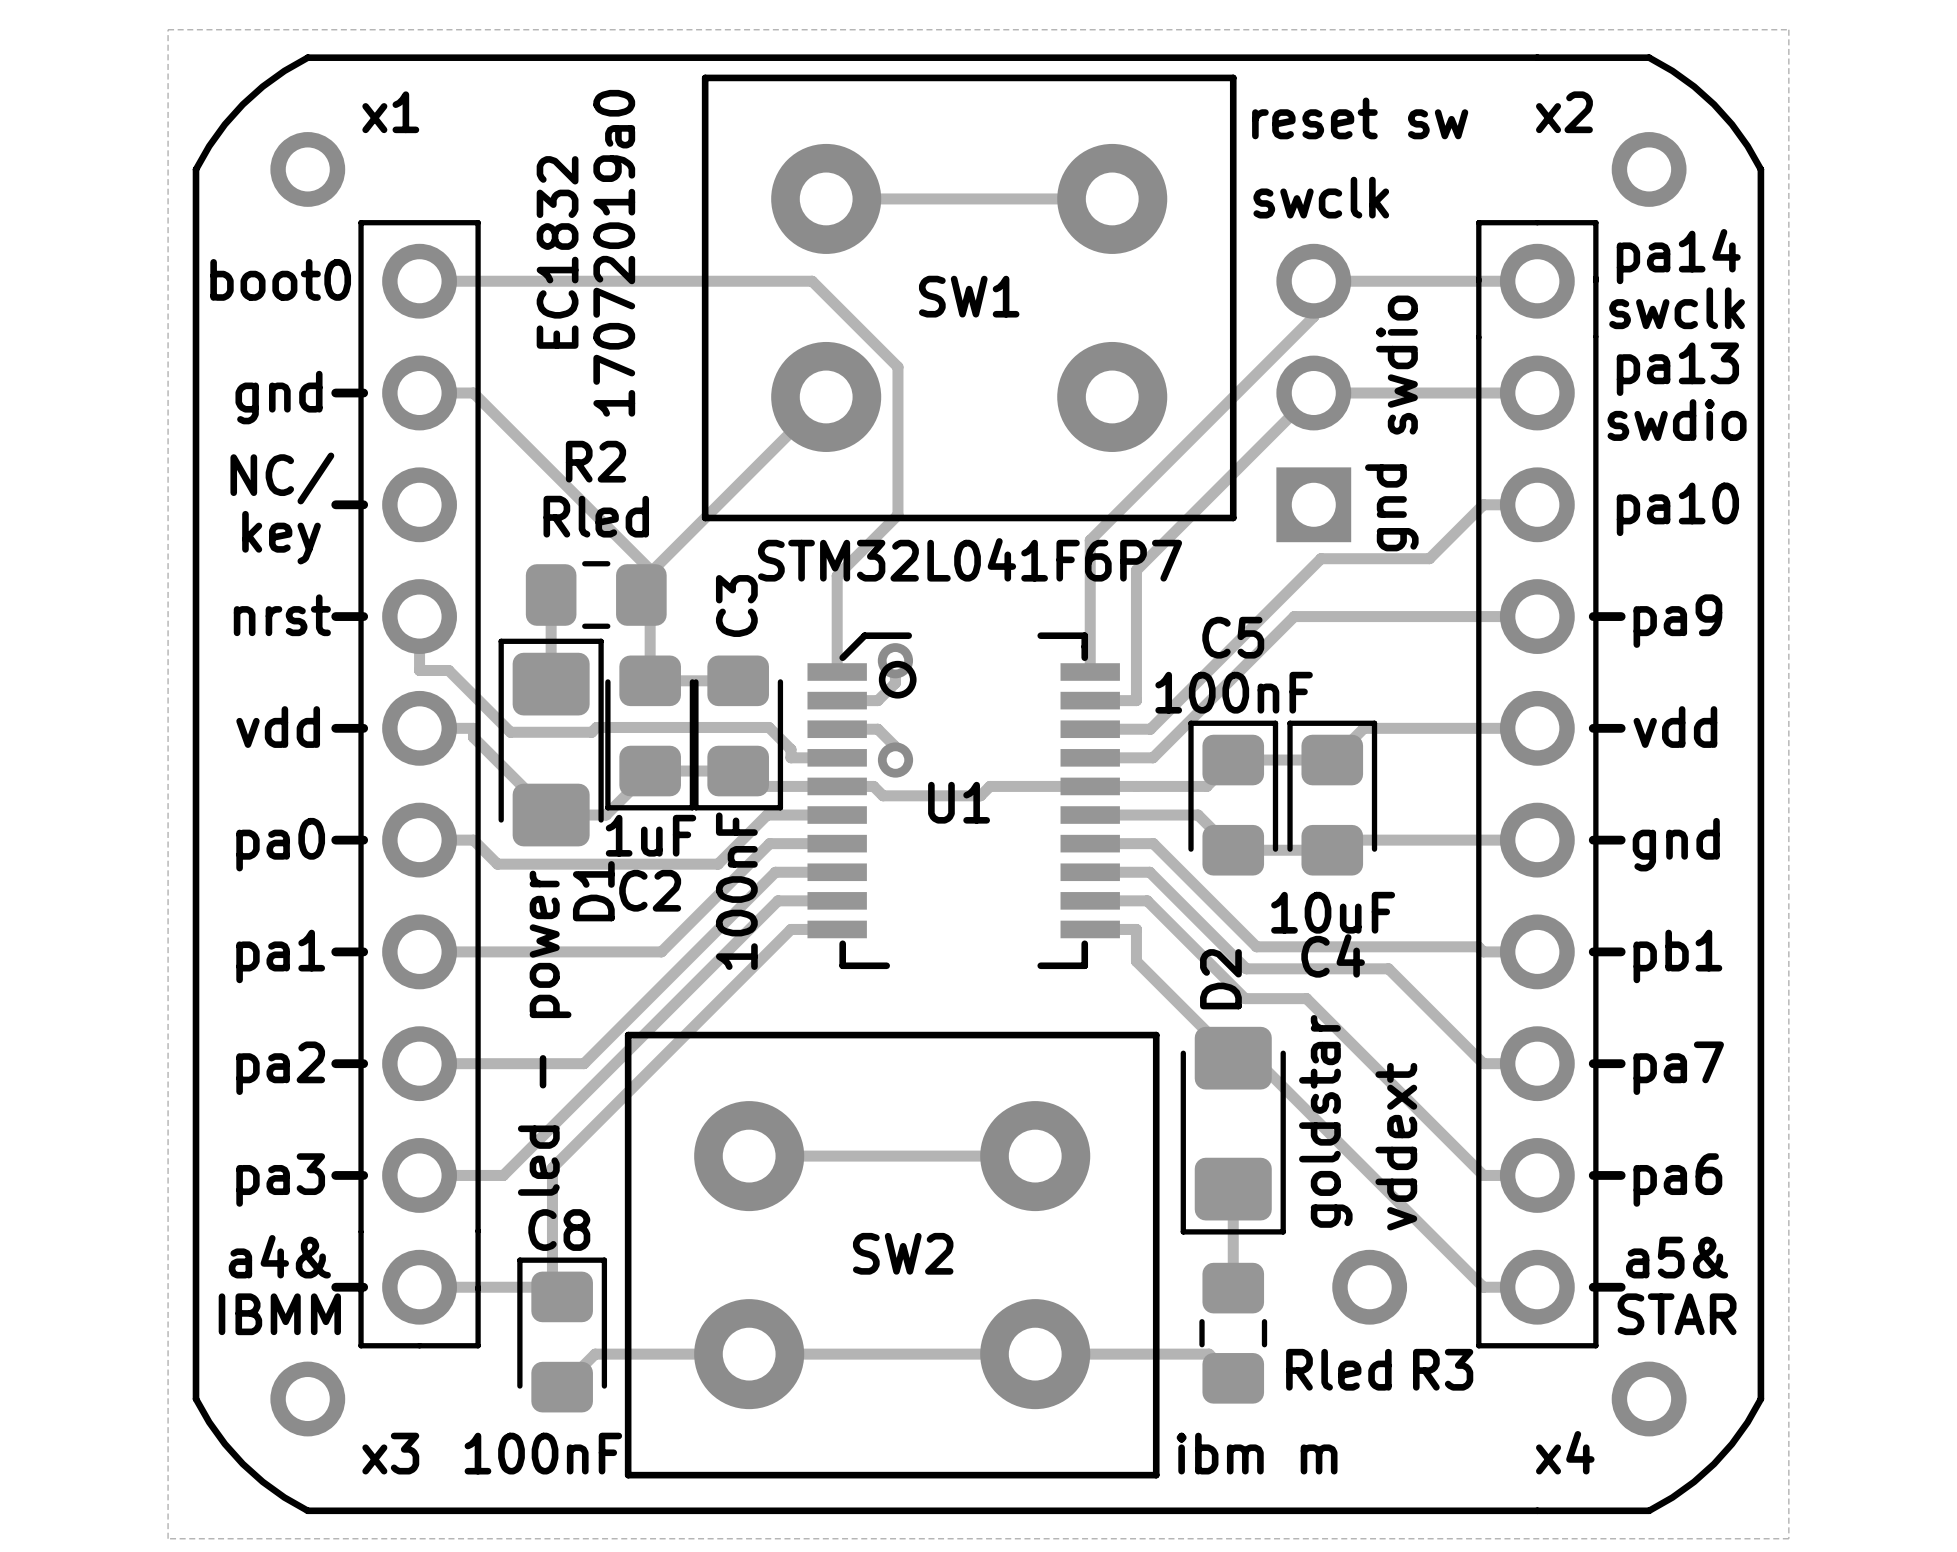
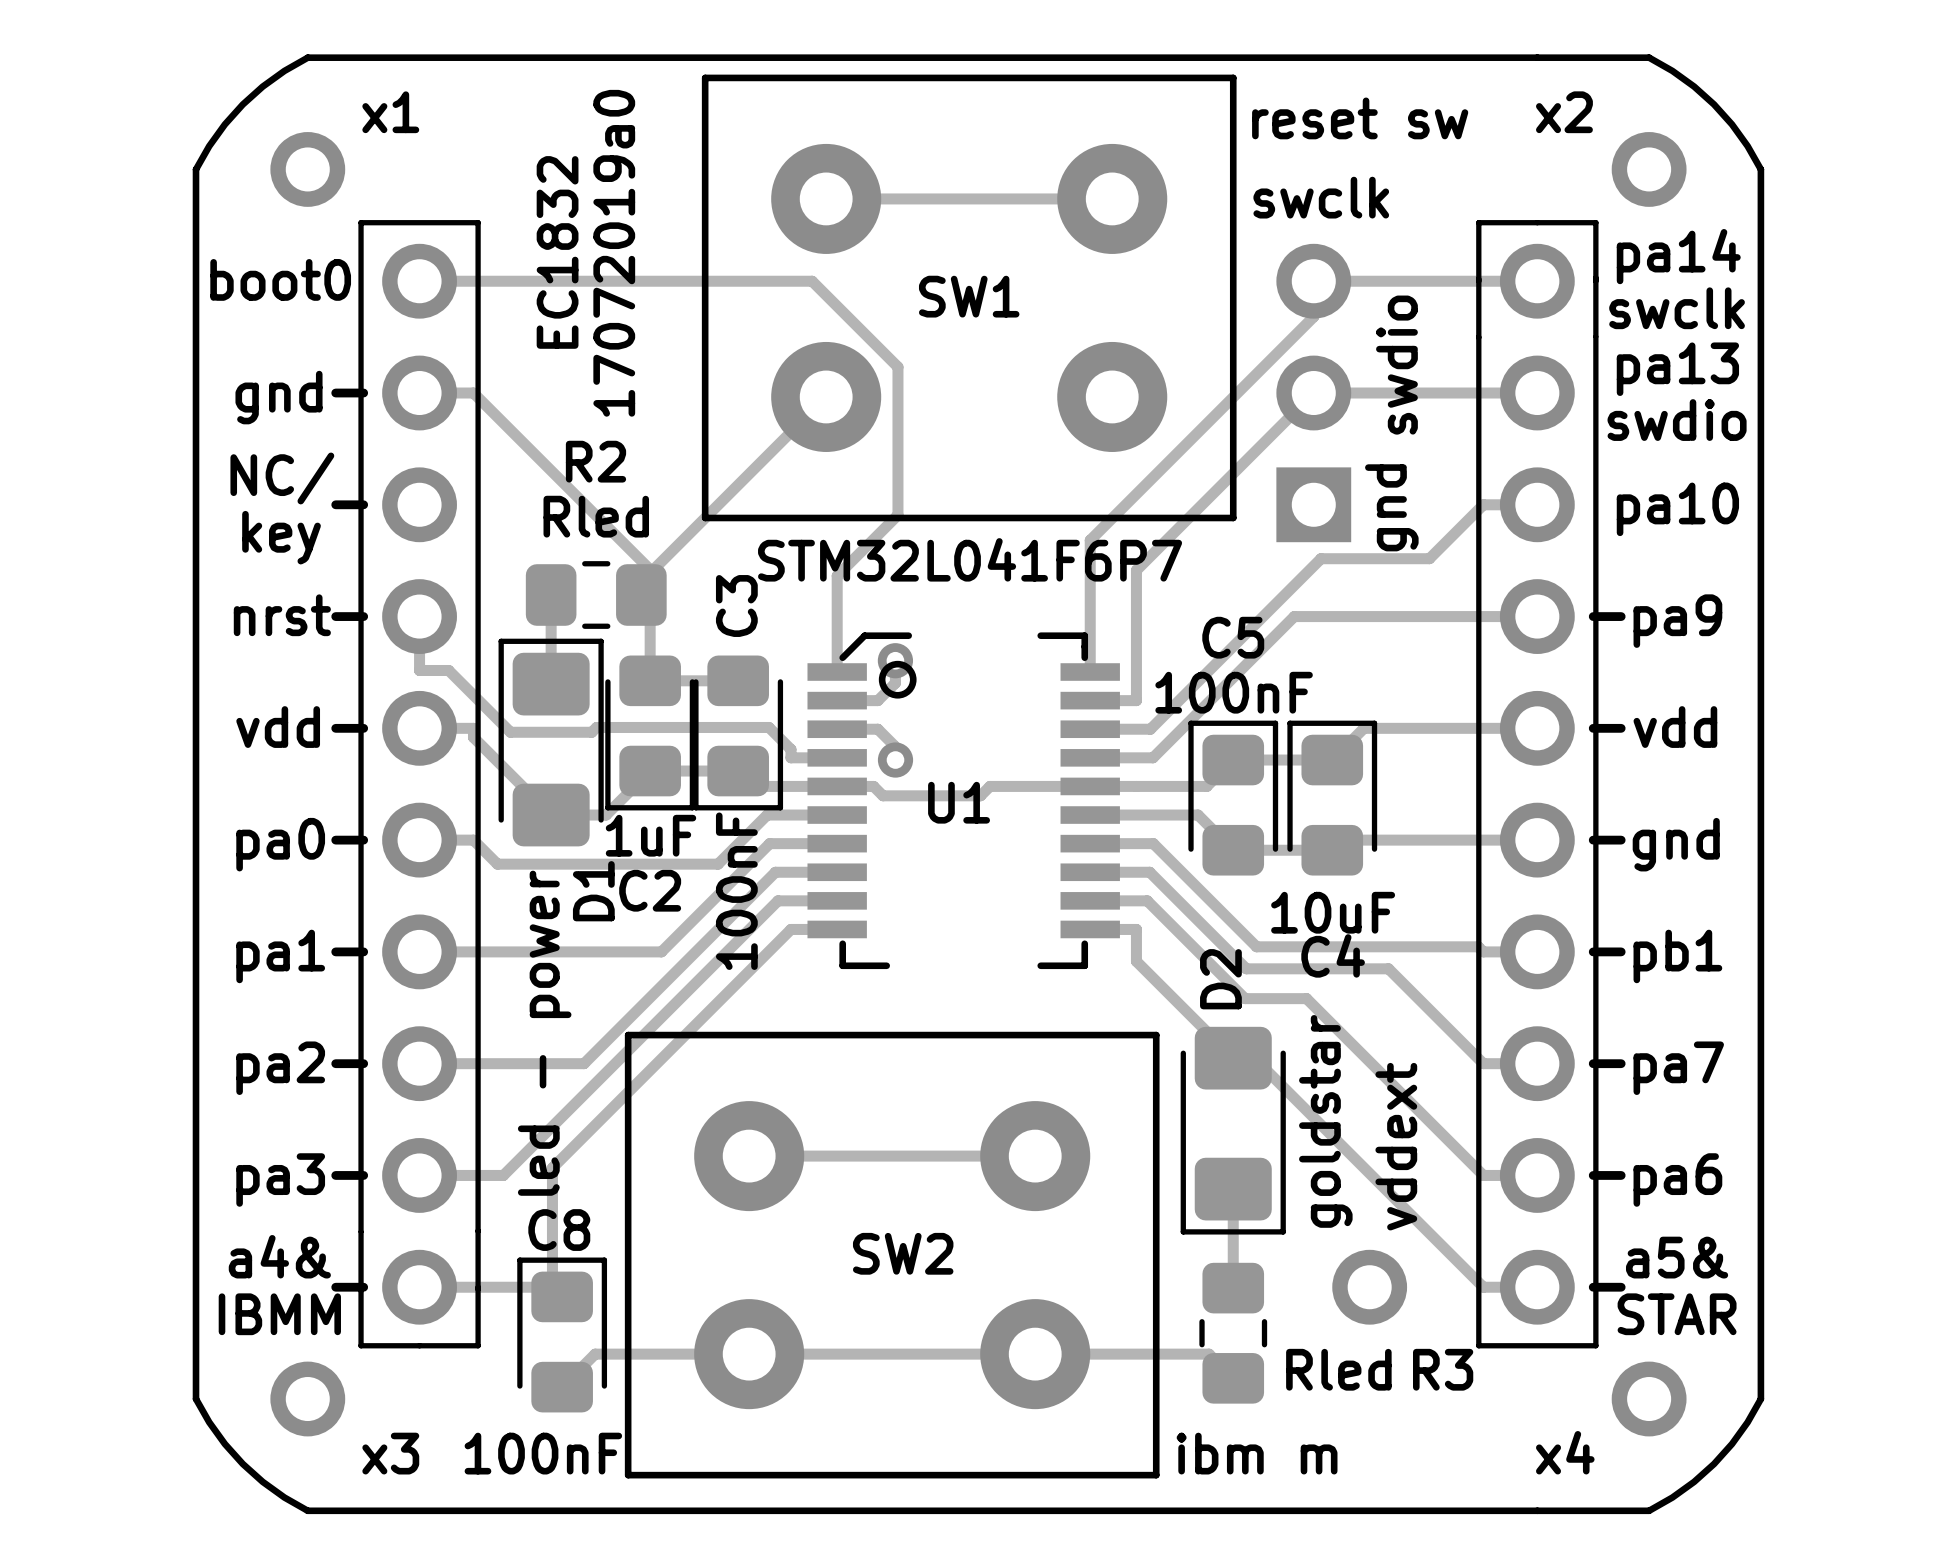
zone outline: (168, 29) (1788, 29) (1788, 1538) (168, 1538) (168, 29) -> none

